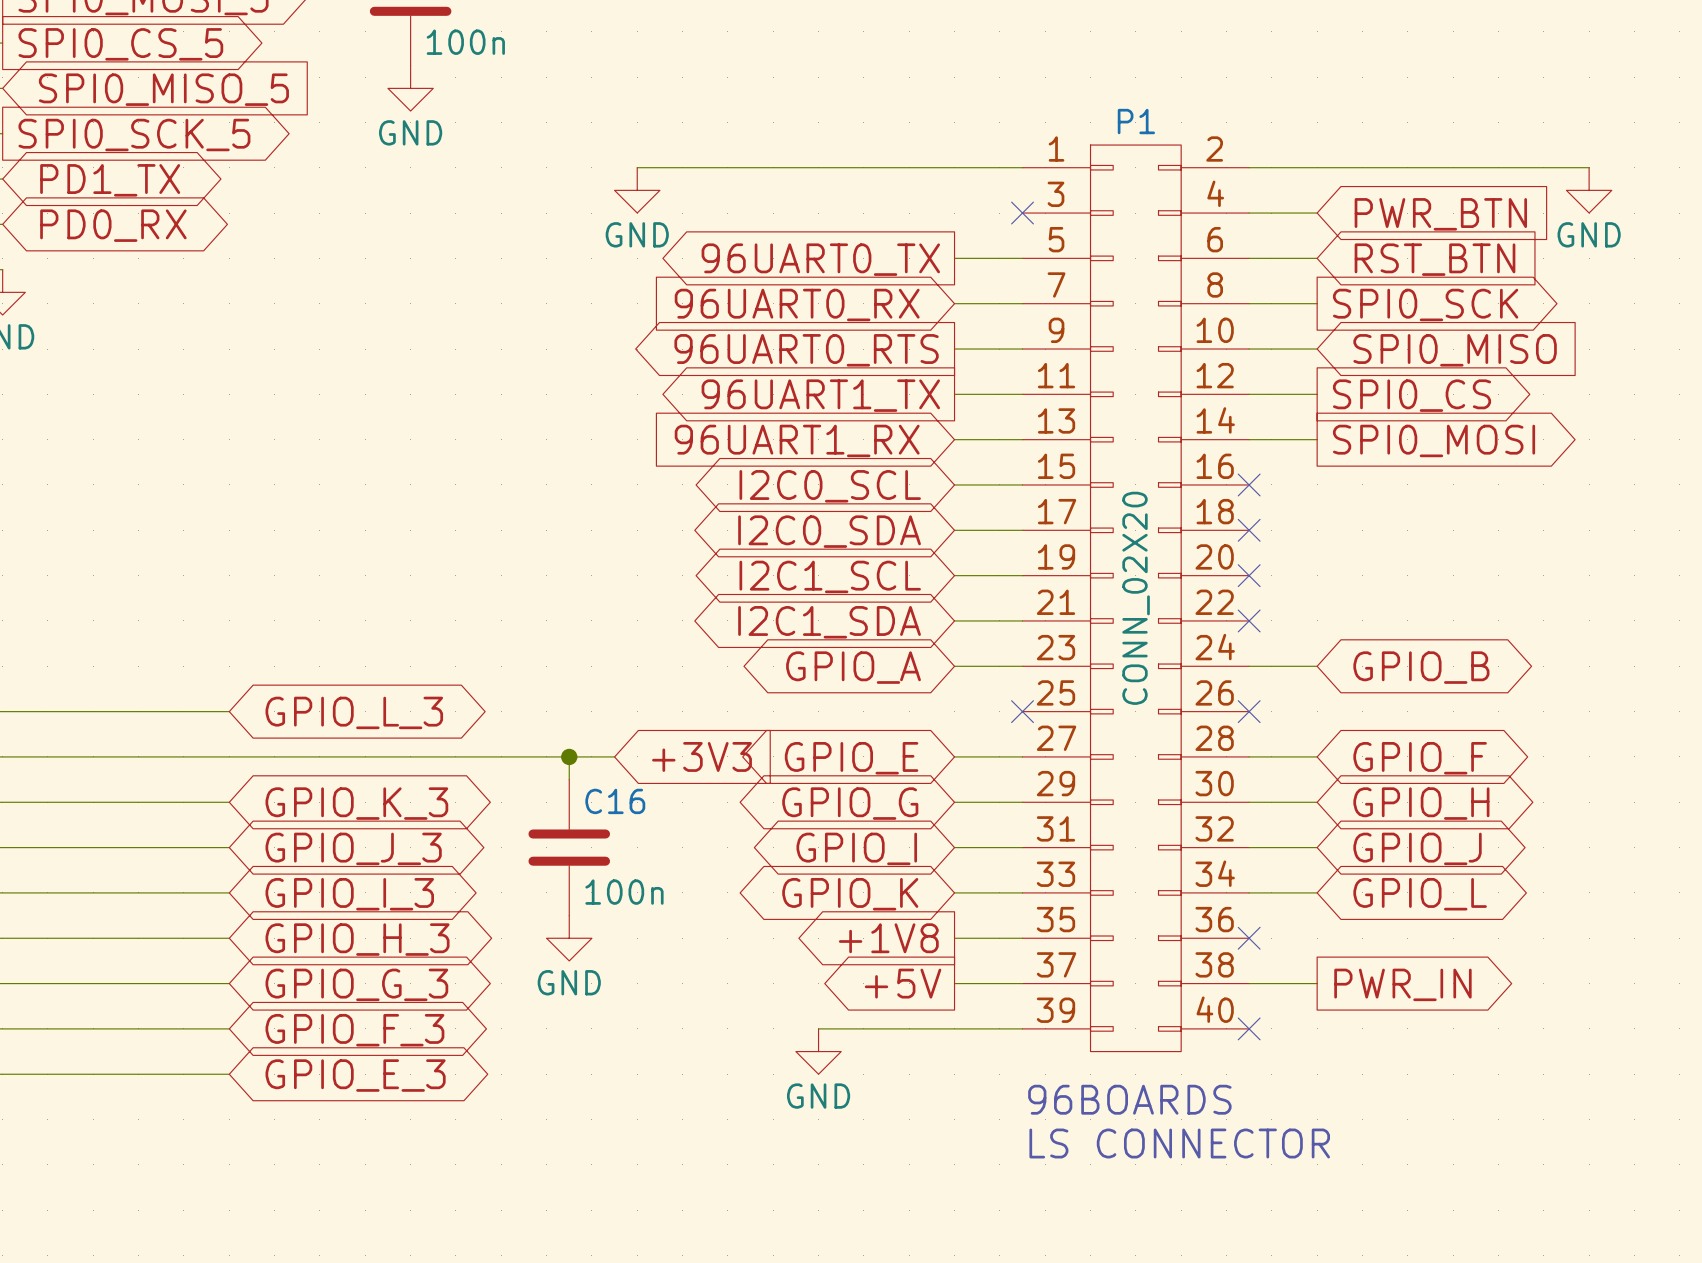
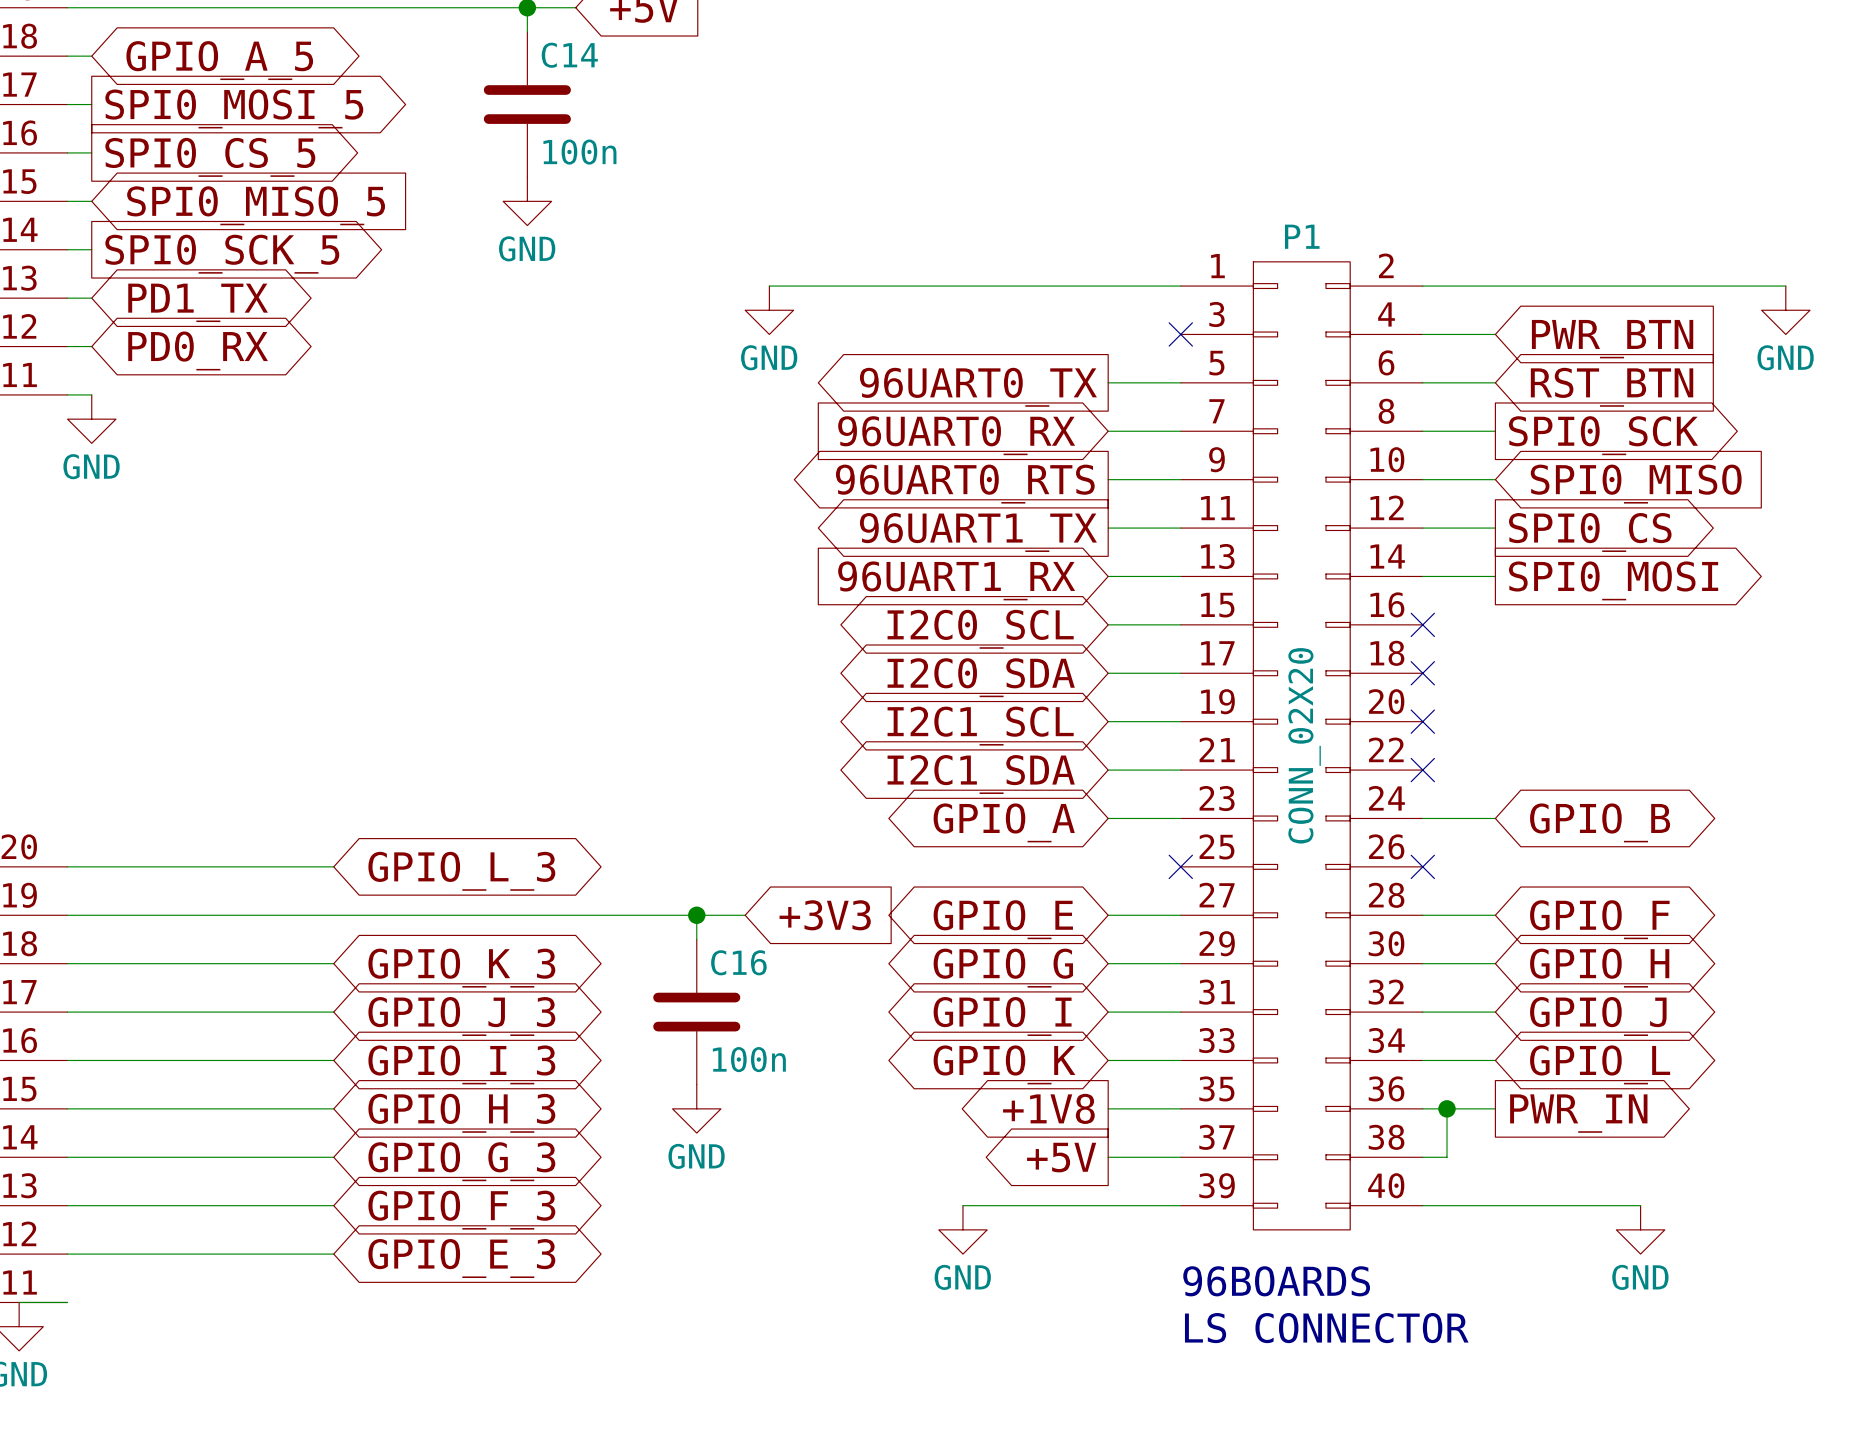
wire: none -> (1422, 1108) (1495, 1108)
no-connect mark: (1249, 938) -> none
junction: none -> (1446, 1108)
wire: (1271, 983) (1317, 983) -> (1446, 1157) (1446, 1108)
global label position: PWR_IN (1402, 984) -> PWR_IN (1578, 1113)
wire: none -> (1422, 1205) (1640, 1205)
no-connect mark: (1249, 1028) -> none
power symbol: none -> GND (1640, 1229)

